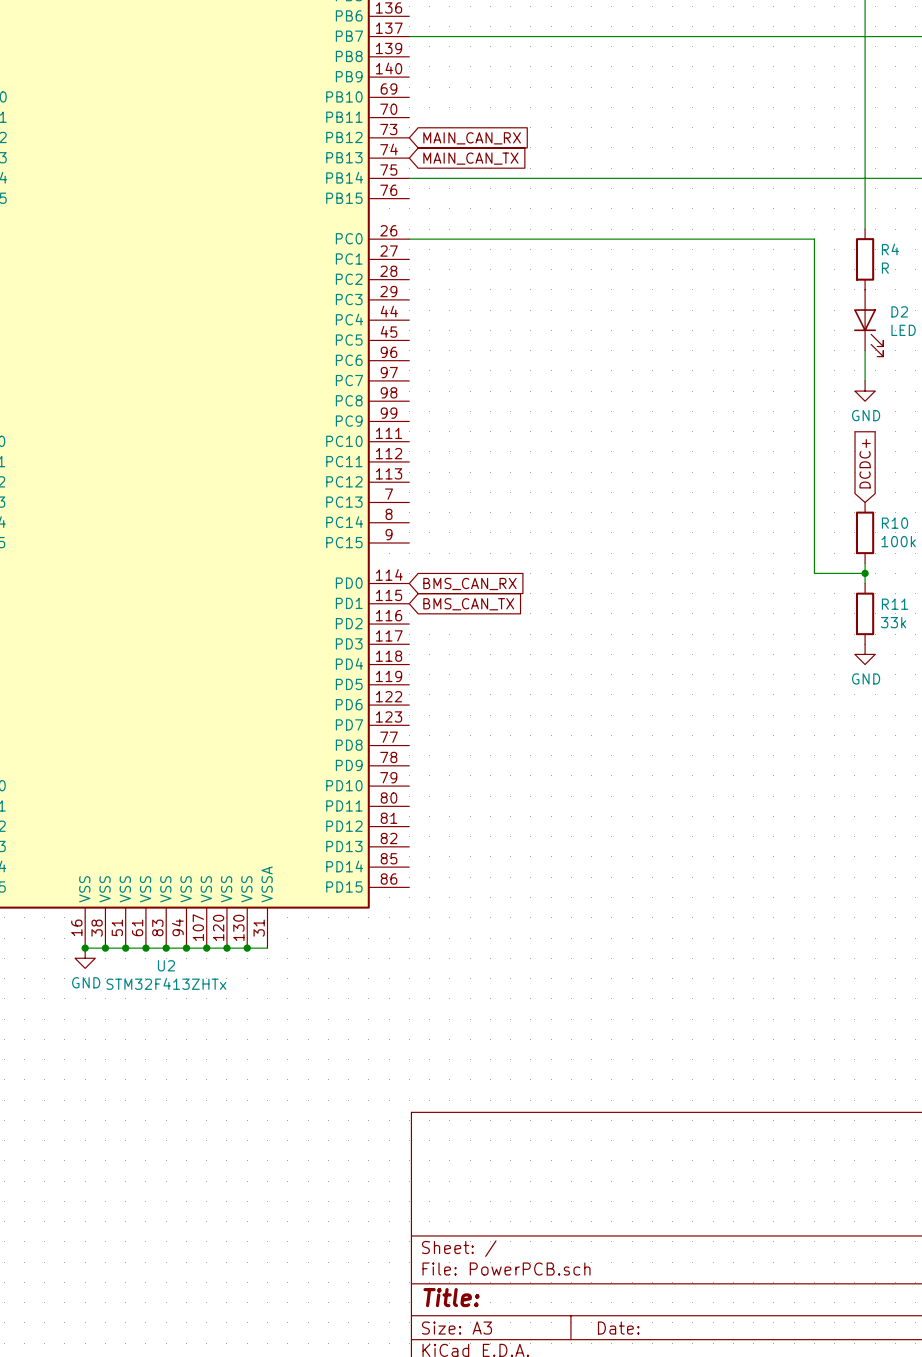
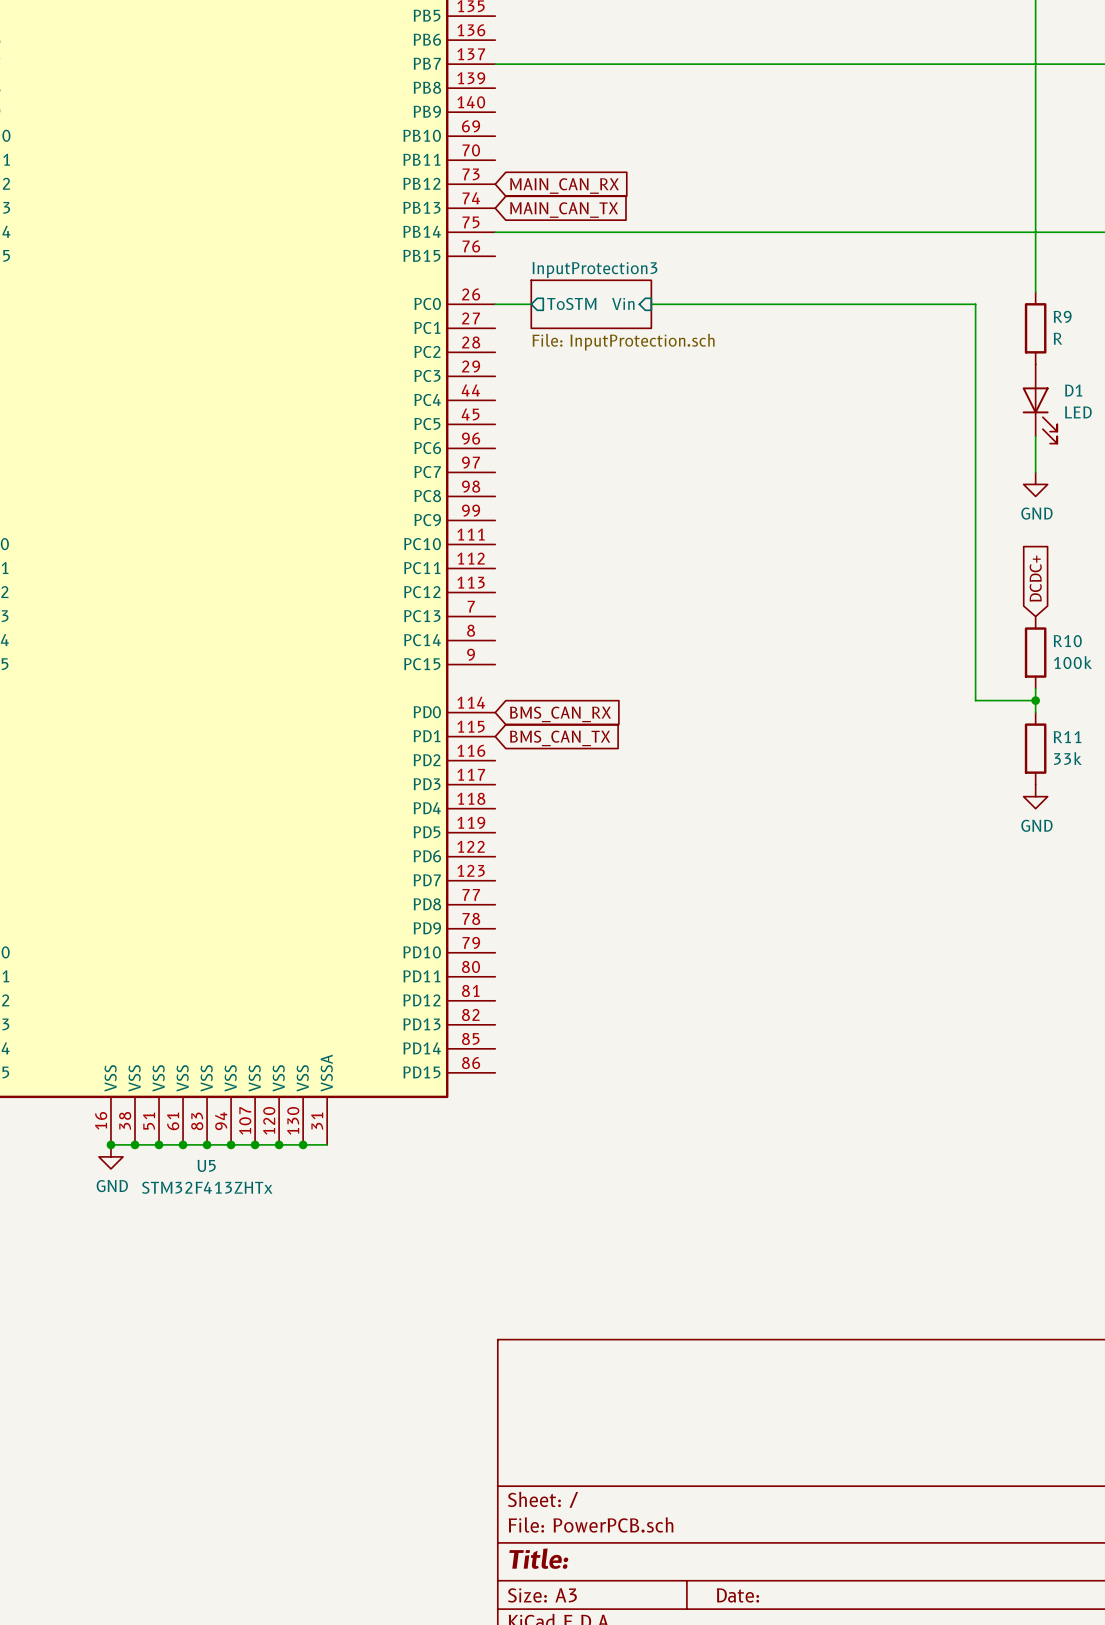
sheet pin: none -> ToSTM (571, 303)
sheet pin: none -> Vin (623, 303)
wire: (439, 239) (540, 239) -> none
sheet InputProtection3: none -> File: InputProtection.sch (591, 304)
R4 name: R4 (890, 249) -> R9 (1062, 316)
D2 name: D2 (899, 311) -> D1 (1073, 390)
U2 name: U2 (166, 965) -> U5 (206, 1165)

